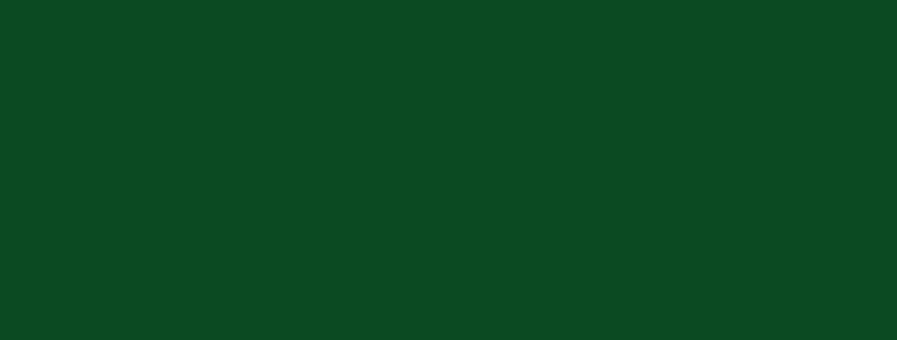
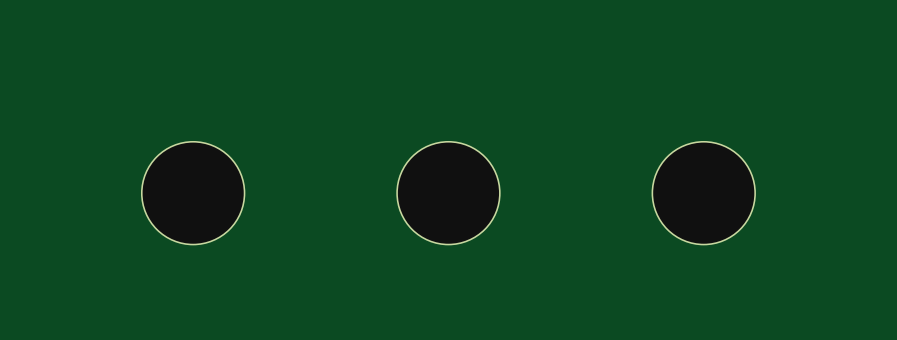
part: none -> (193, 193)
part: none -> (448, 193)
part: none -> (703, 193)

